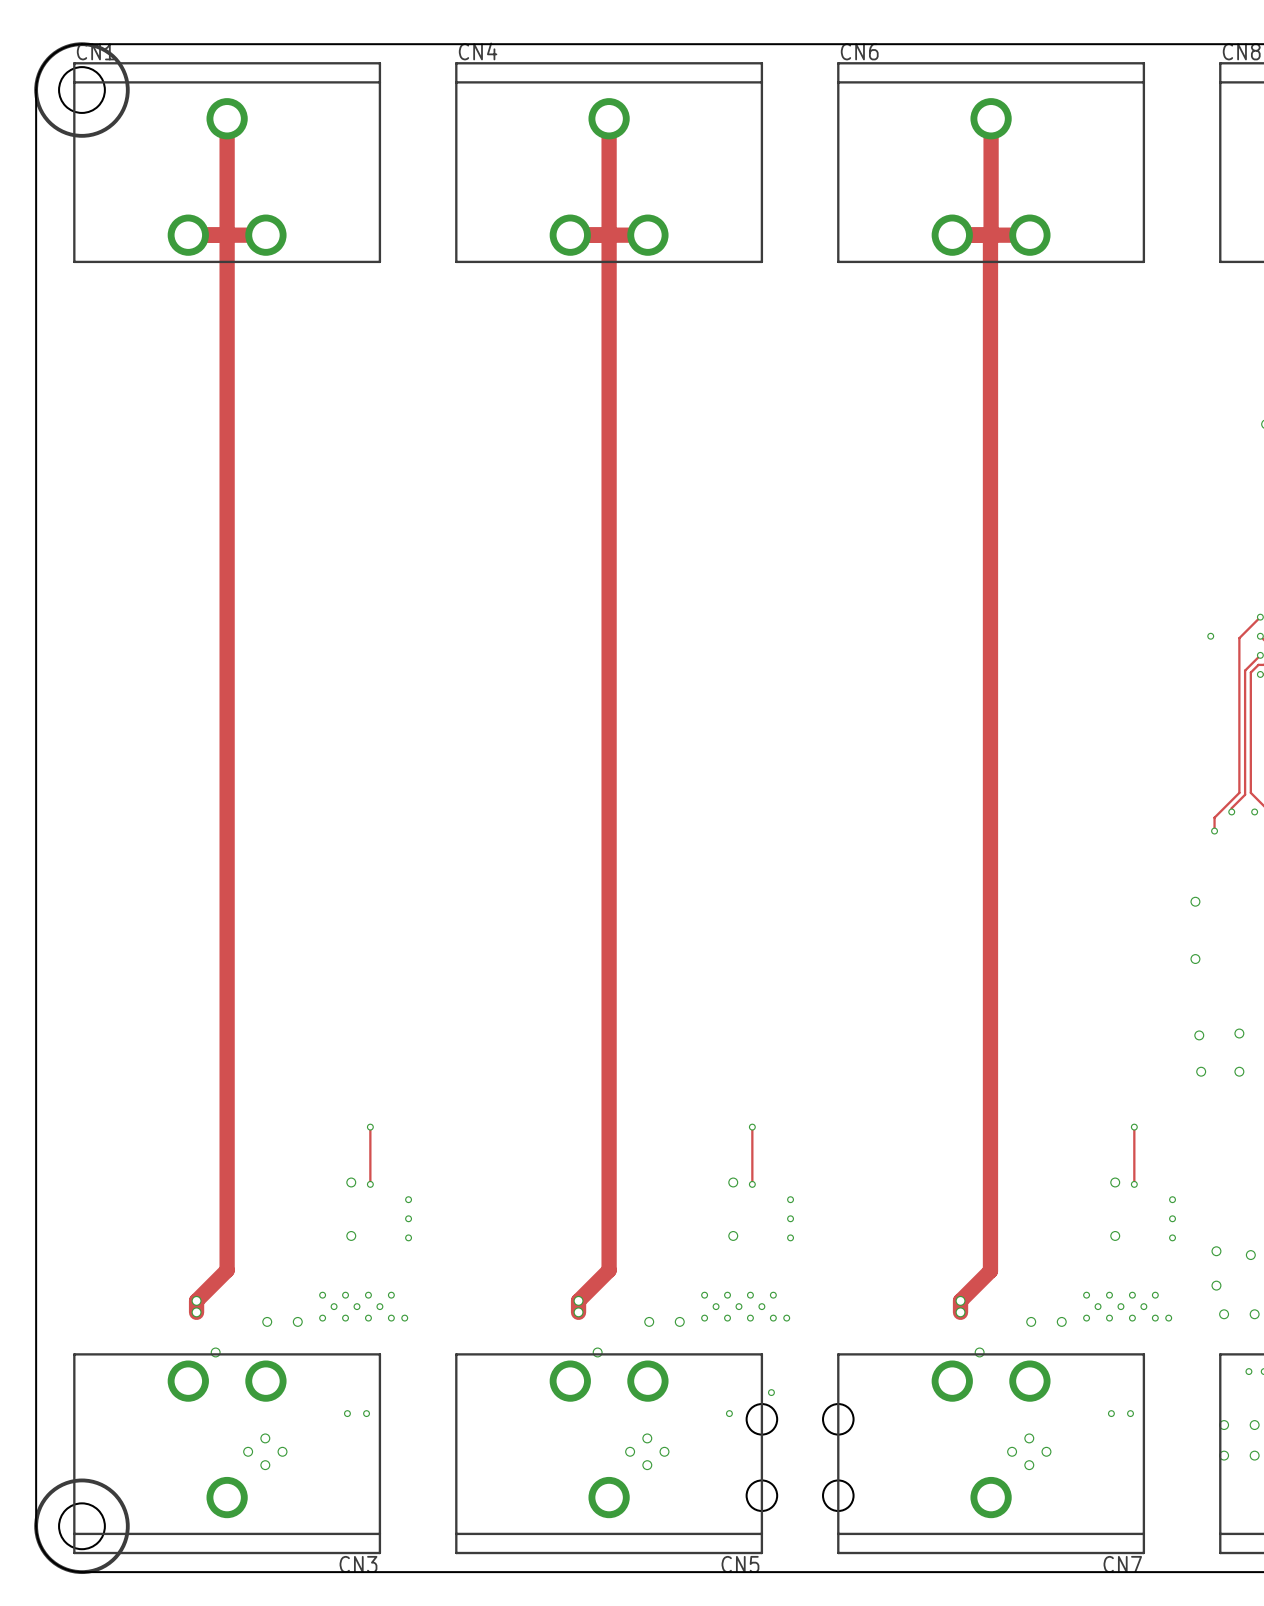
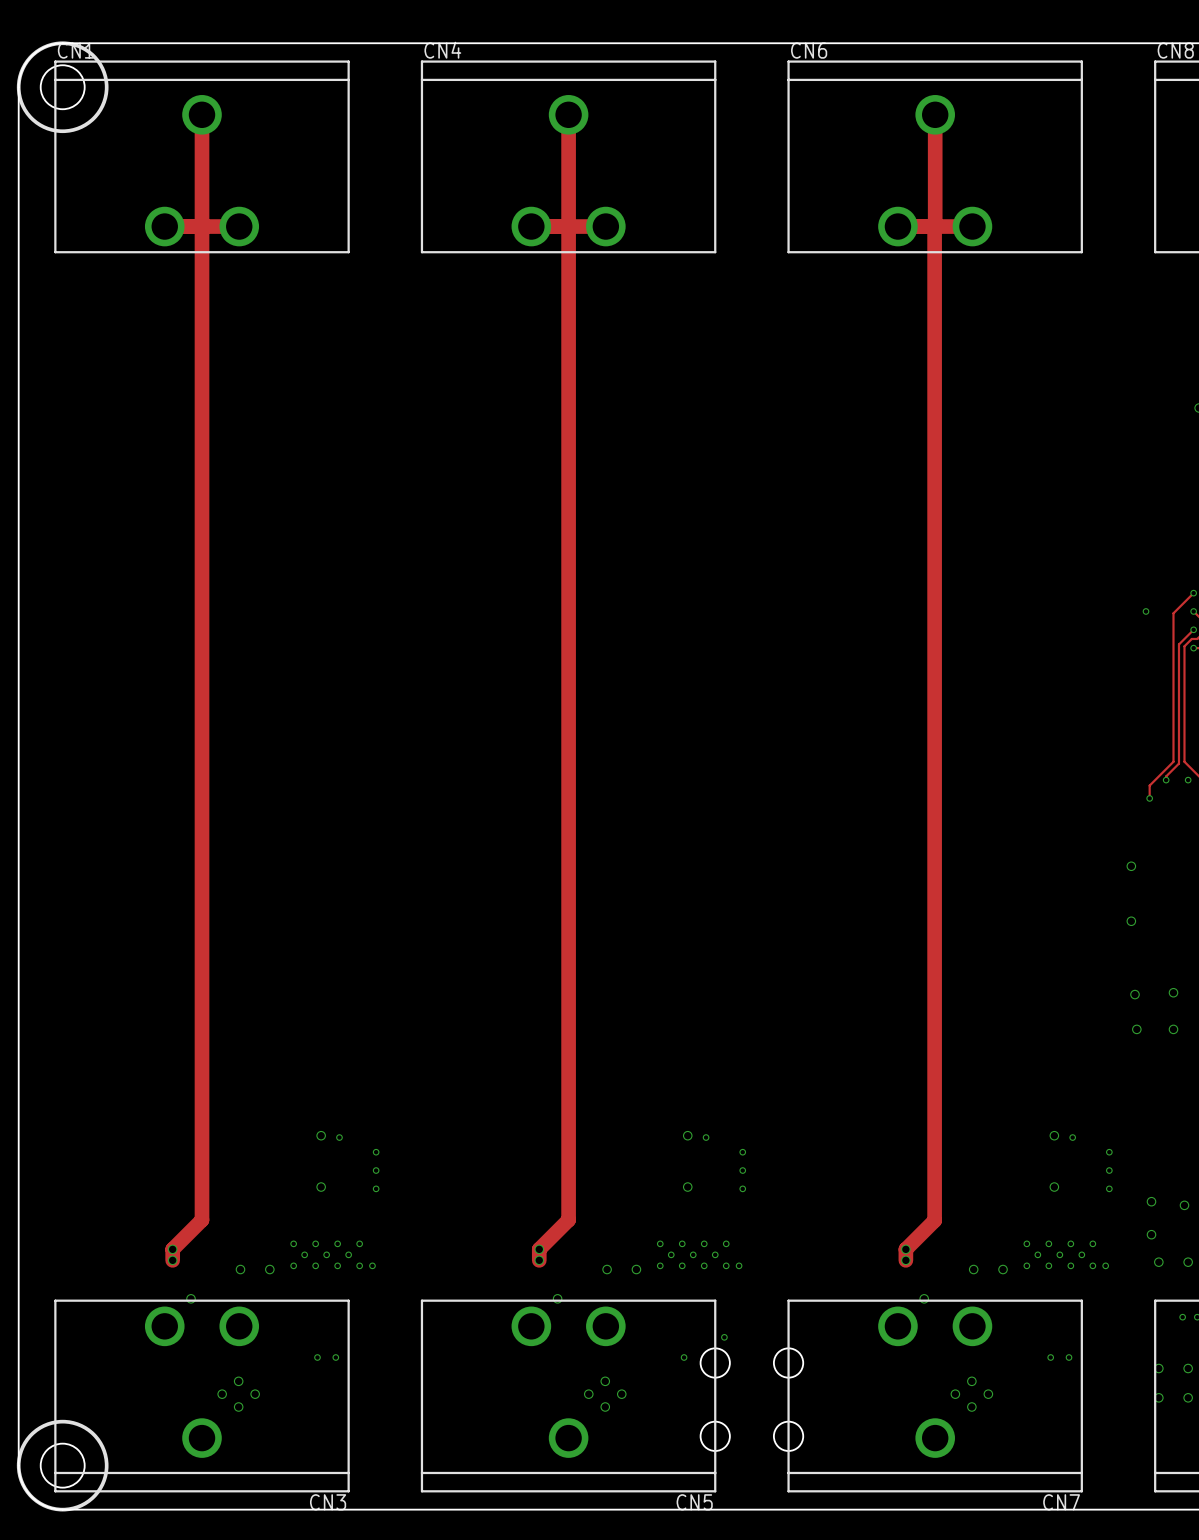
track: (370, 1127) (370, 1184) -> none
via: (370, 1127) -> none
track: (752, 1127) (752, 1184) -> none
via: (752, 1127) -> none
track: (1134, 1127) (1134, 1184) -> none
via: (1134, 1127) -> none

